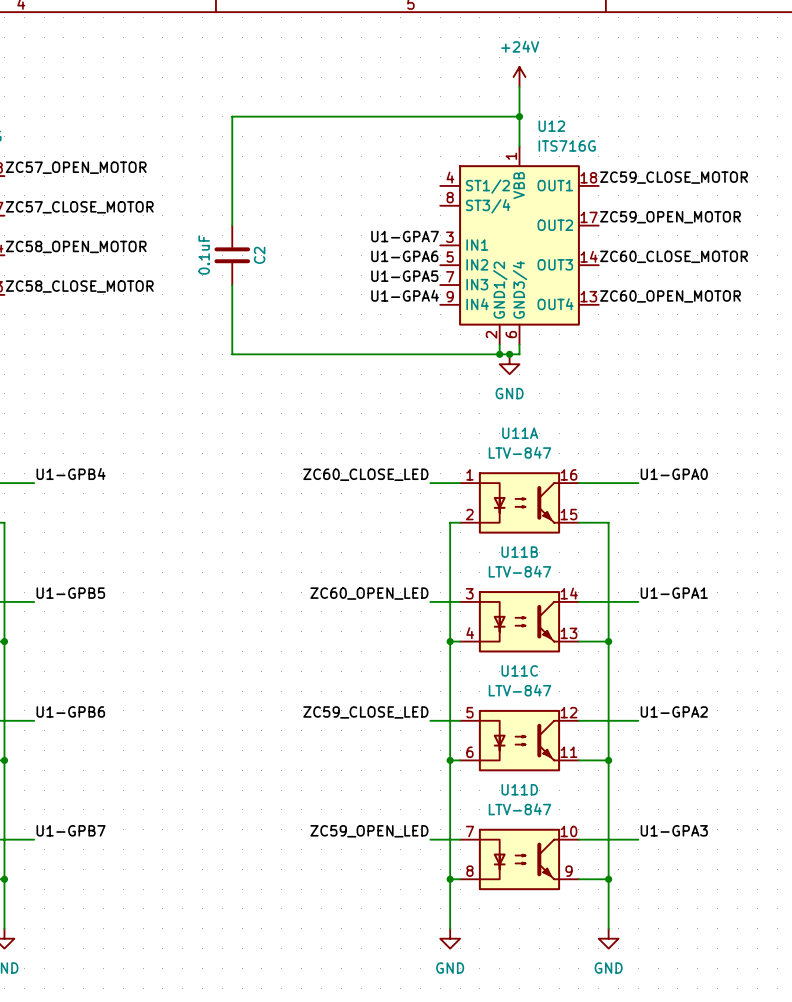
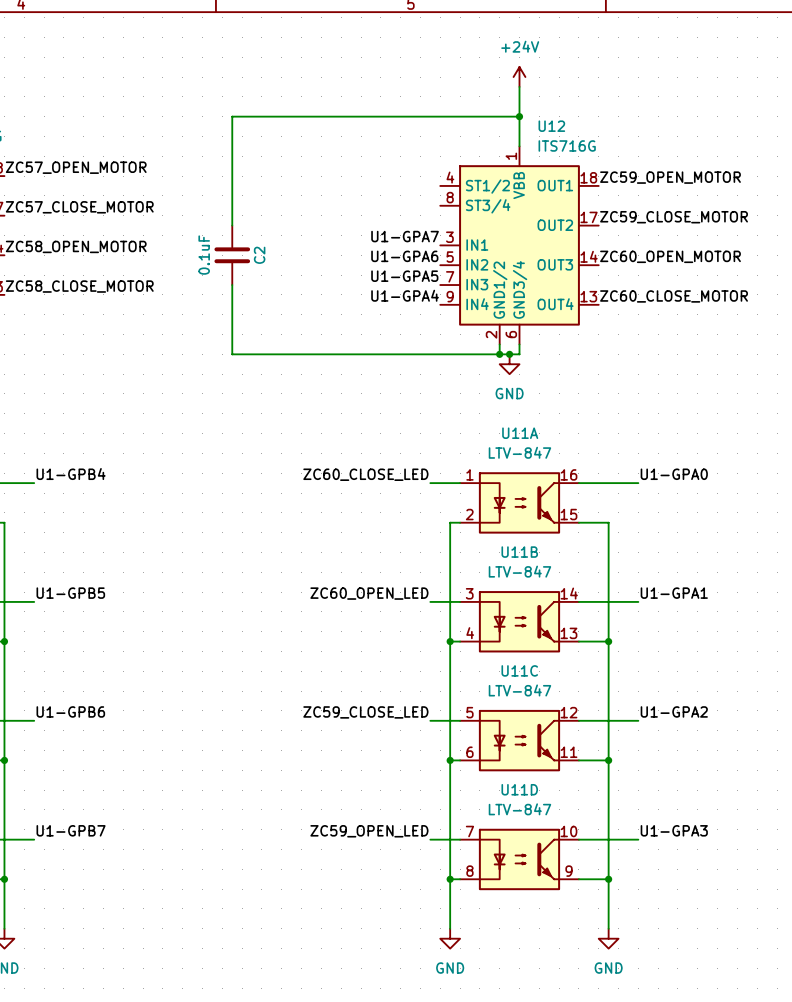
label: ZC59_CLOSE_MOTOR (674, 177) -> ZC59_OPEN_MOTOR (670, 177)
label: ZC59_OPEN_MOTOR (670, 217) -> ZC59_CLOSE_MOTOR (674, 217)
label: ZC60_CLOSE_MOTOR (674, 256) -> ZC60_OPEN_MOTOR (670, 256)
label: ZC60_OPEN_MOTOR (670, 296) -> ZC60_CLOSE_MOTOR (674, 296)

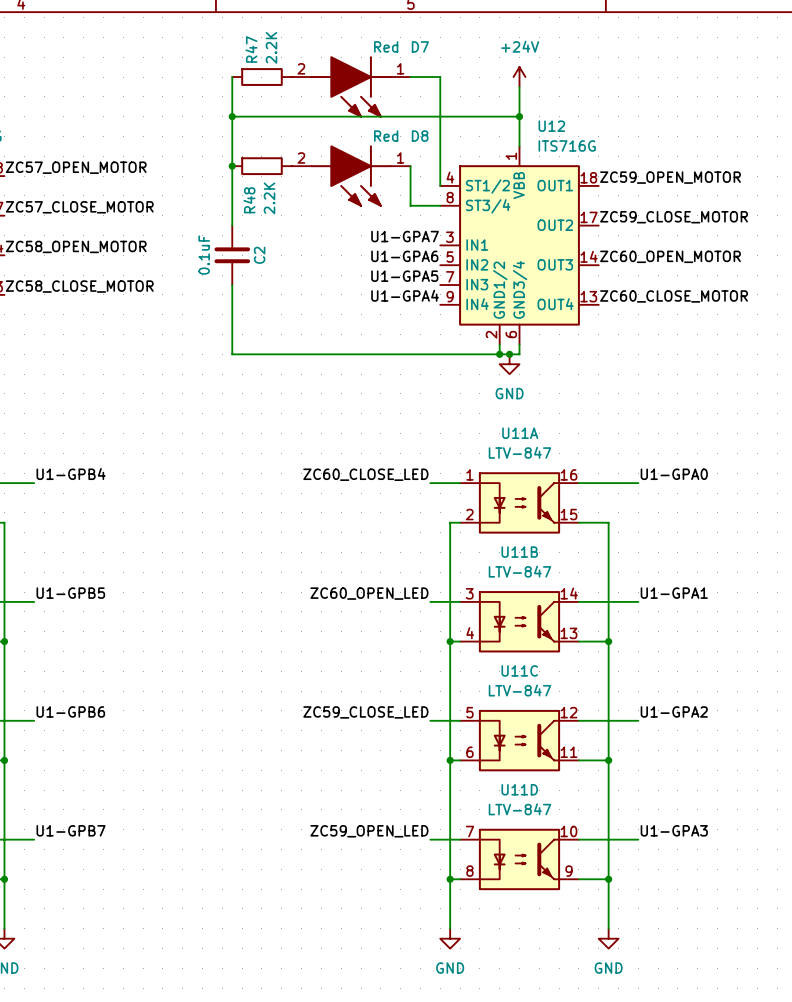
wire: none -> (232, 77) (232, 116)
R47: none -> 2.2K (261, 77)
wire: none -> (410, 77) (440, 77) (440, 185)
D7: none -> Red (351, 86)
junction: none -> (232, 116)
junction: none -> (232, 166)
R48: none -> 2.2K (261, 166)
wire: none -> (410, 166) (410, 205) (440, 205)
D8: none -> Red (351, 176)

